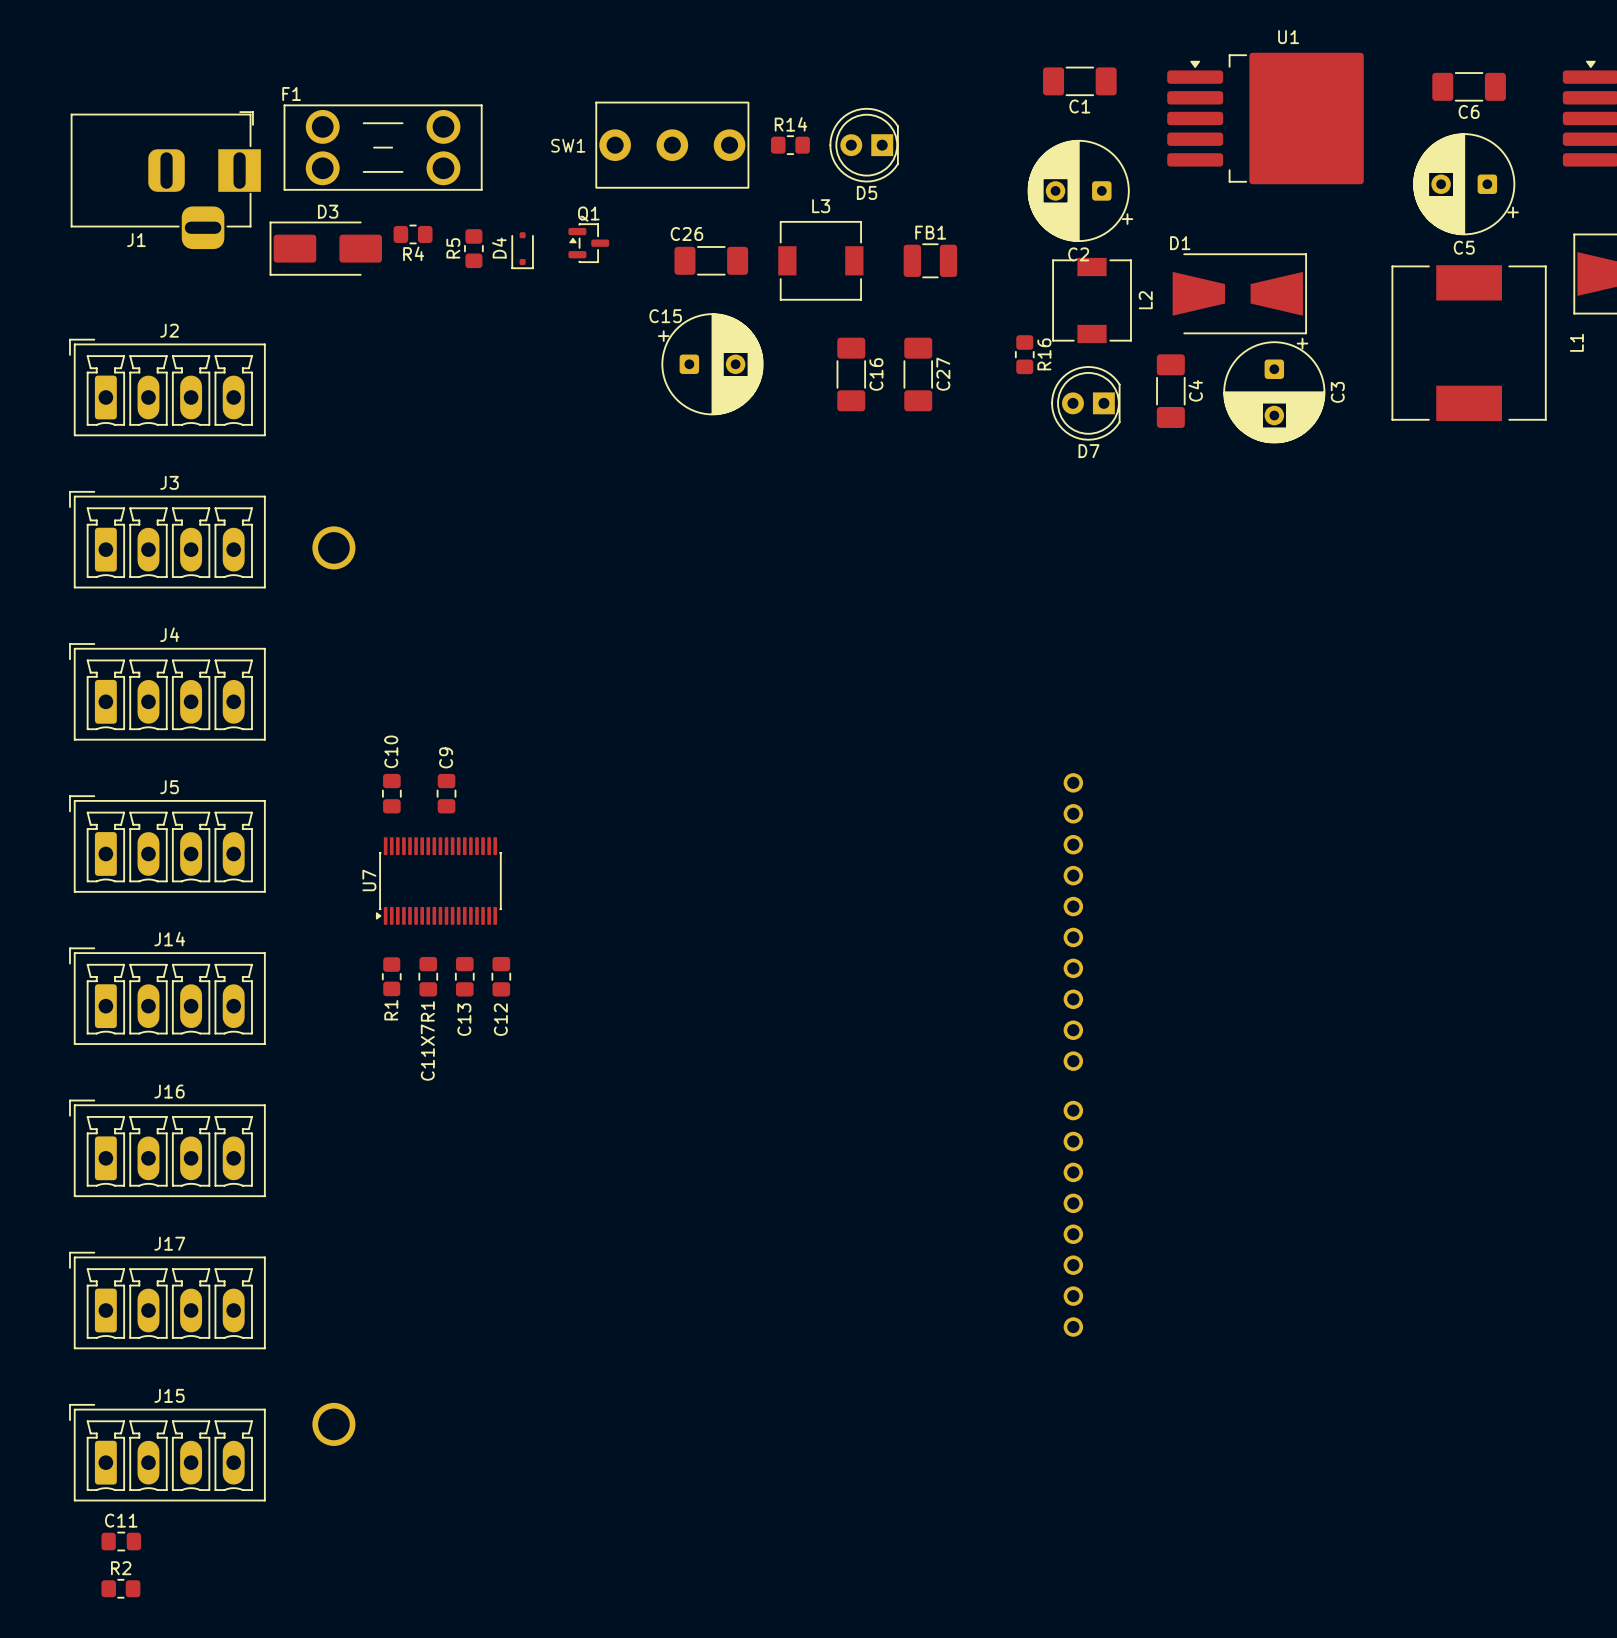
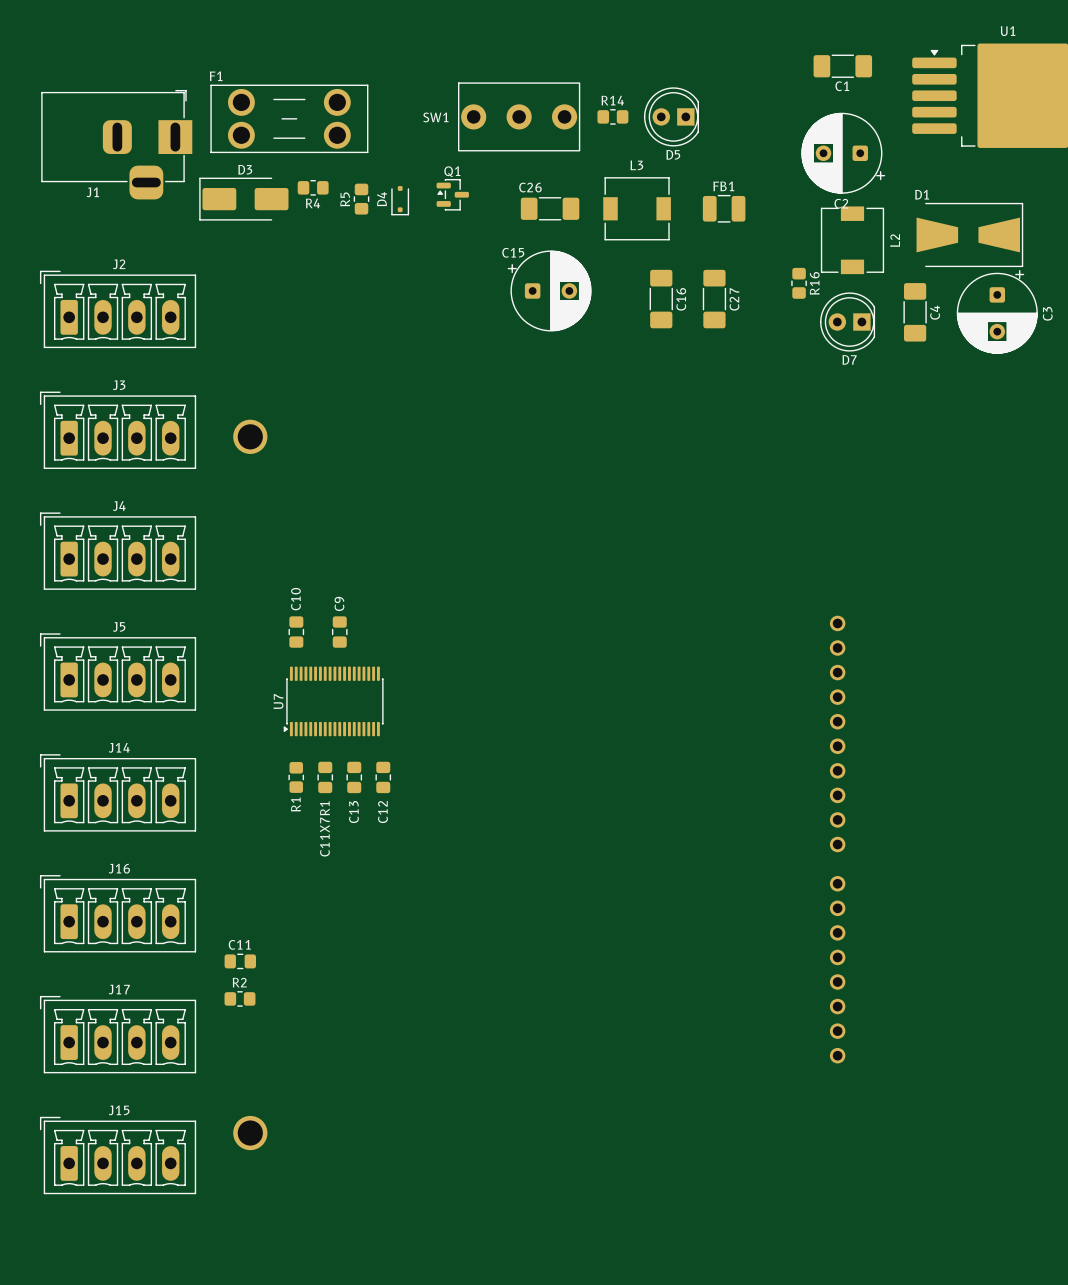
C11 position: (121, 1541) -> (240, 961)
R2 position: (120, 1588) -> (239, 998)

